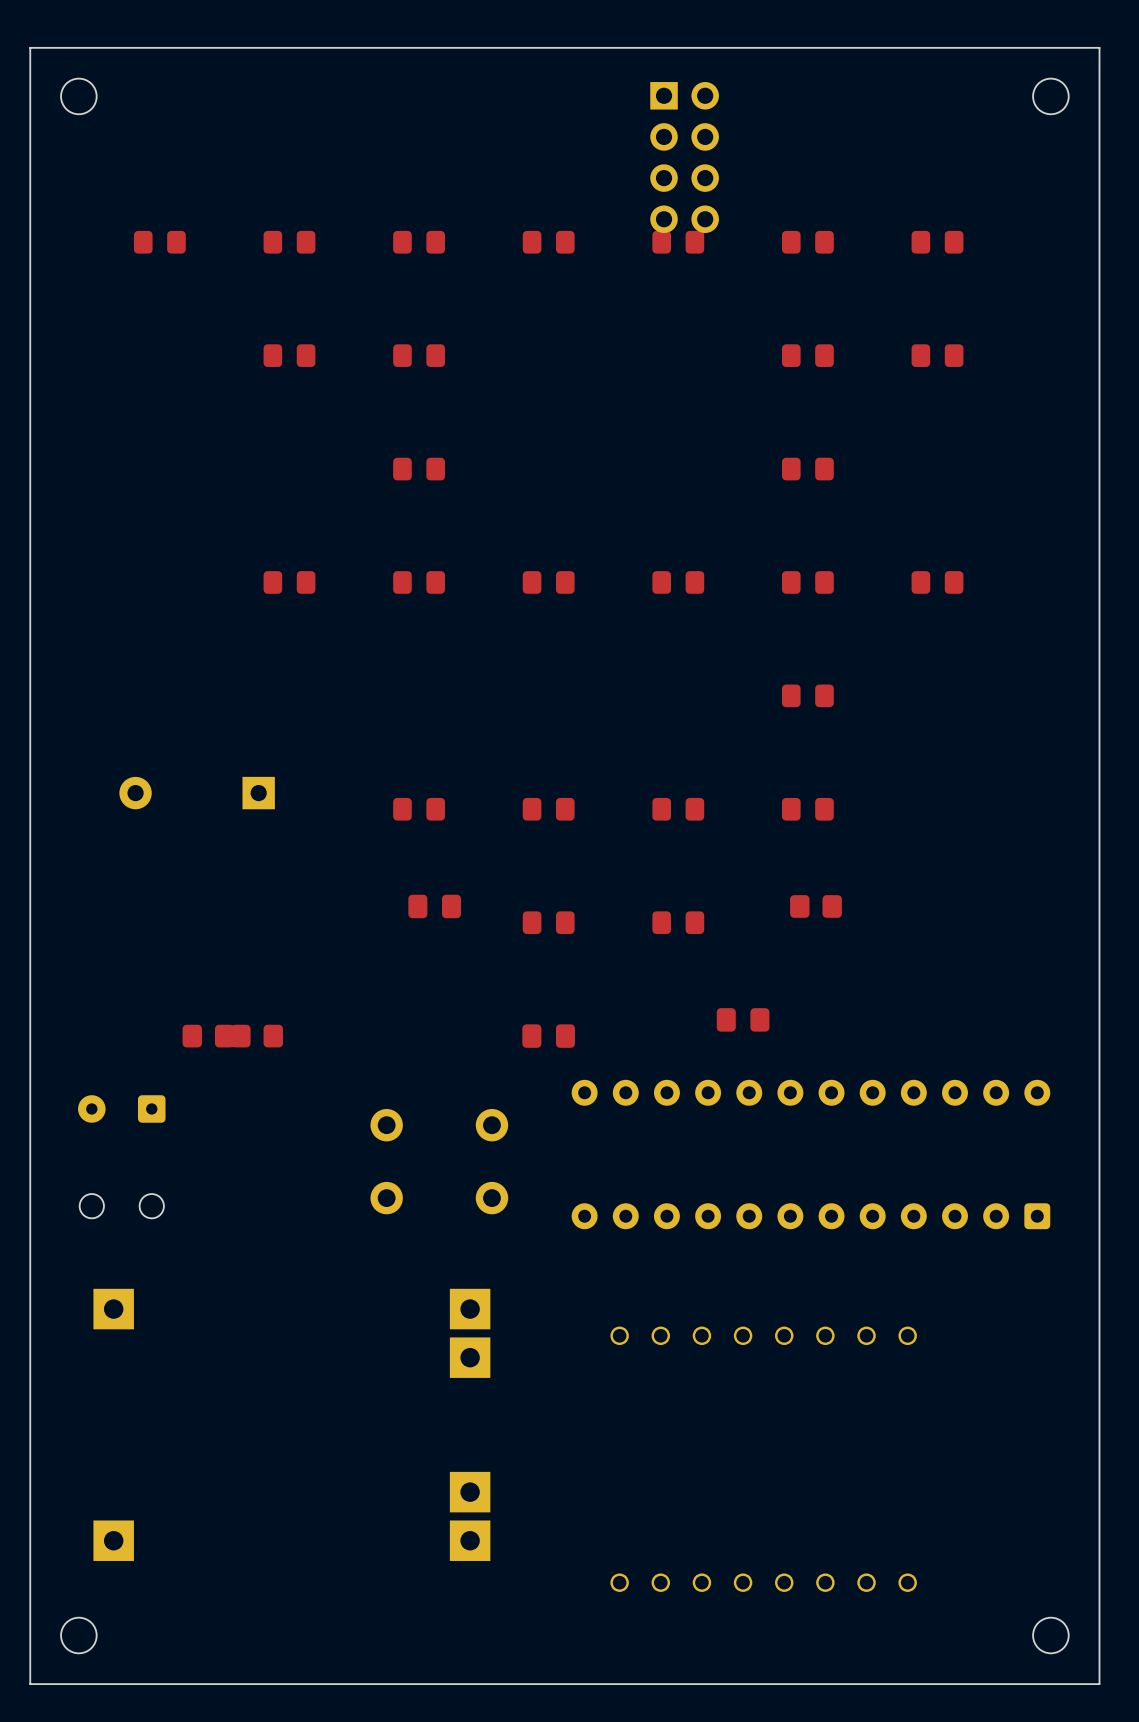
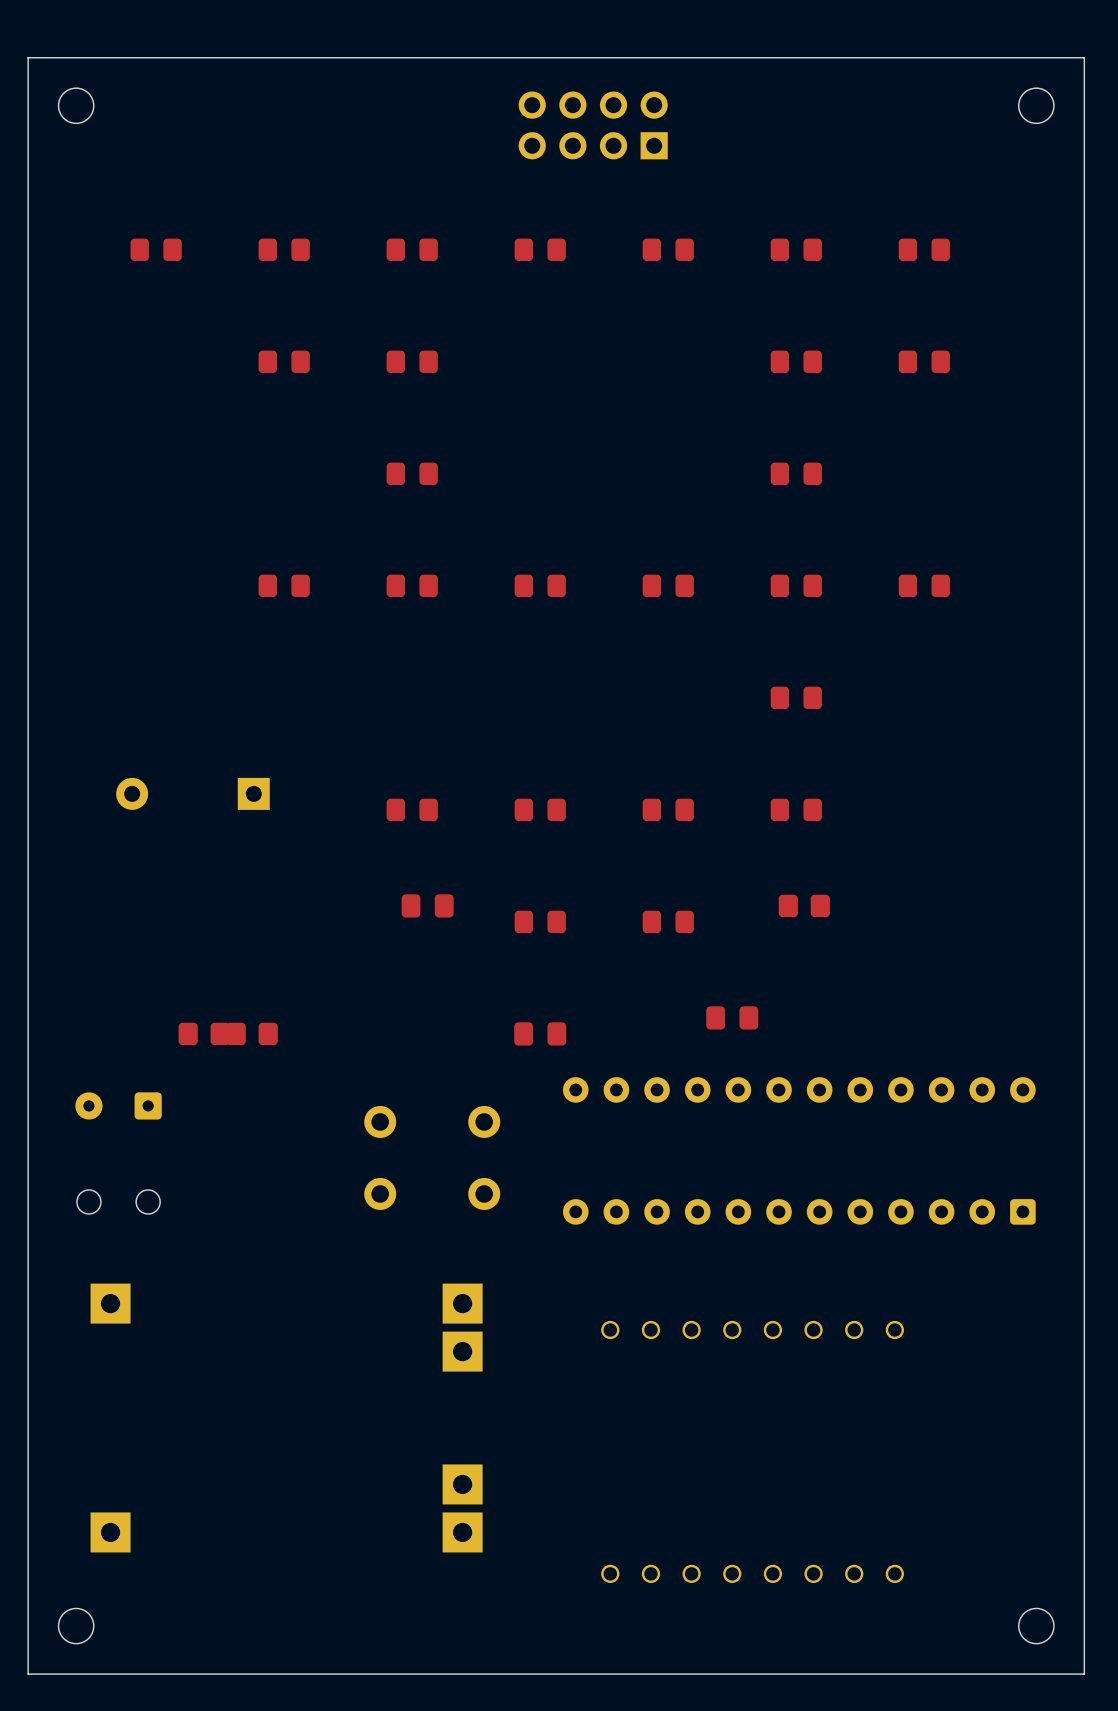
part: none -> (593, 125)
part: (684, 157) -> none

